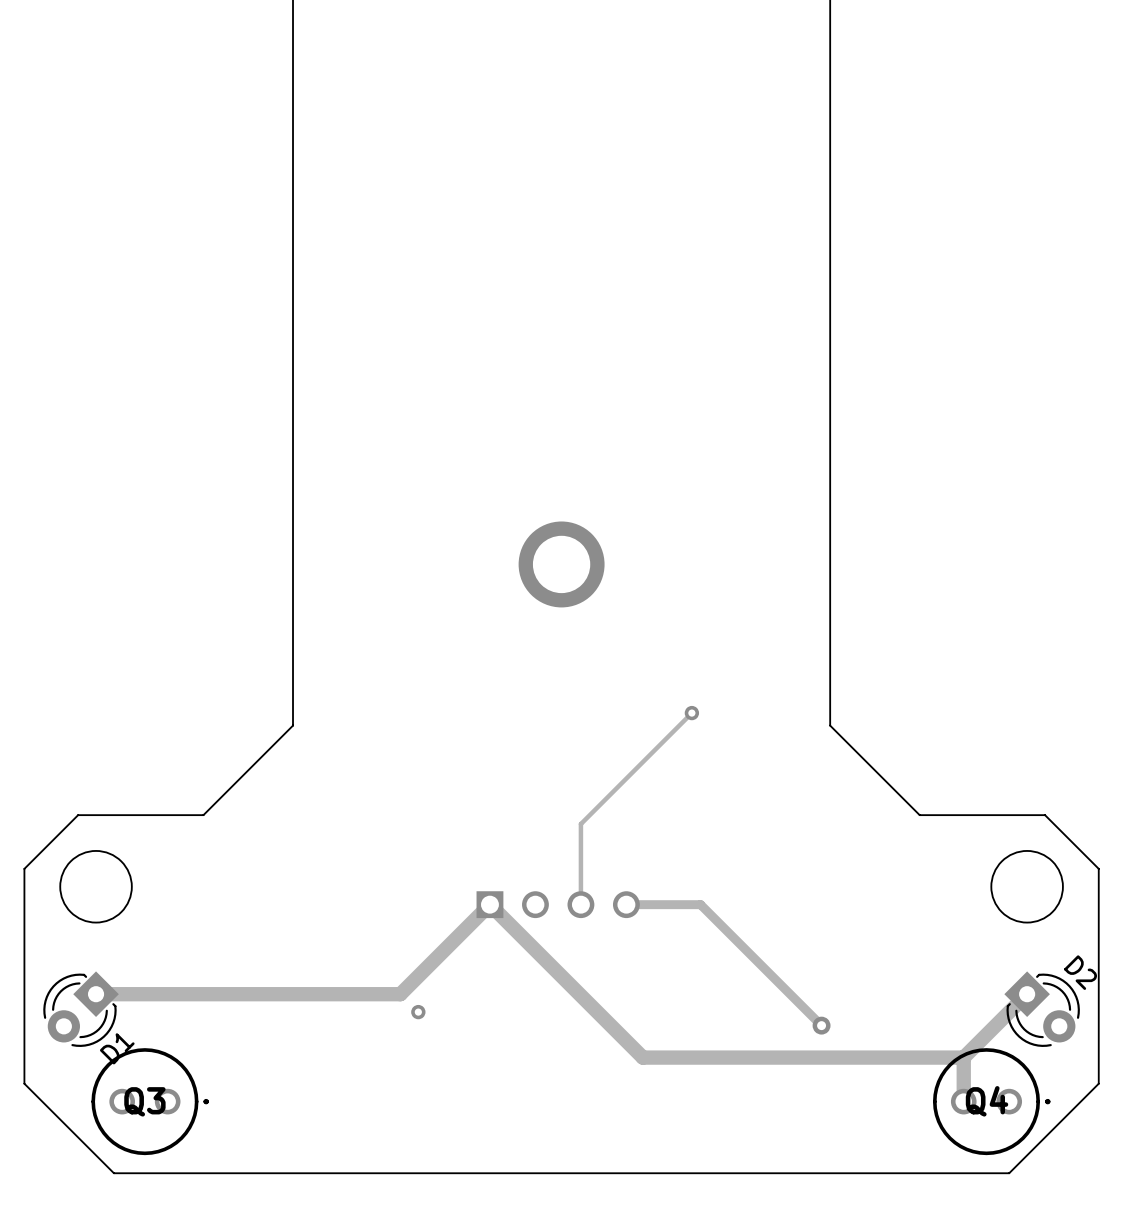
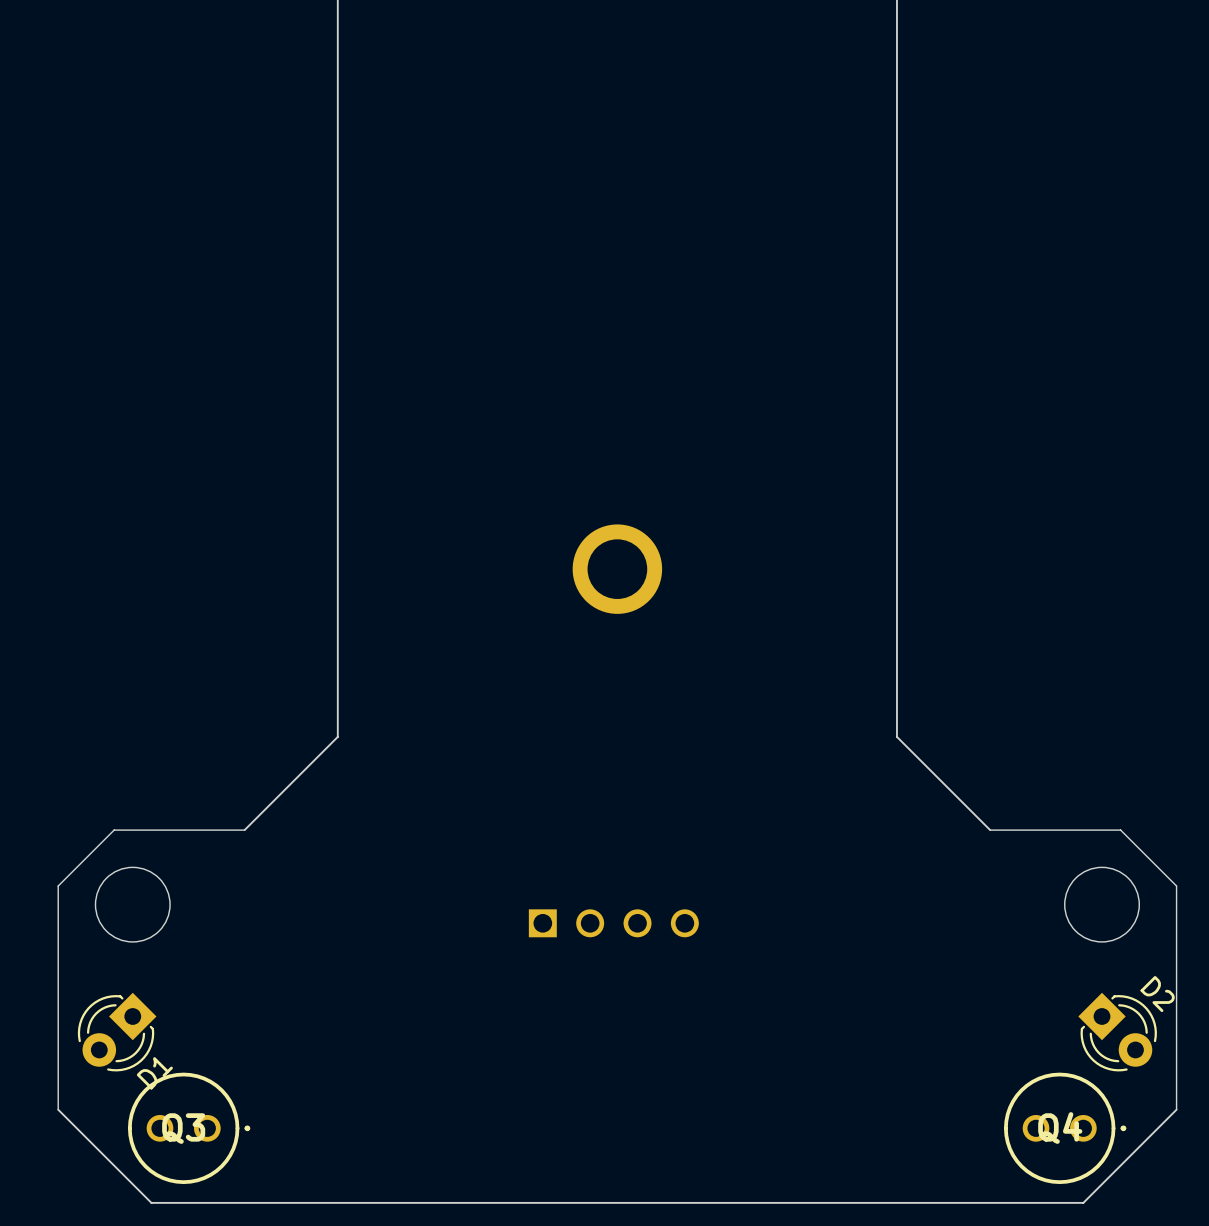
track: (691, 713) (580, 824) (580, 904) -> none
via: (691, 713) -> none
track: (626, 904) (700, 904) (821, 1025) -> none
track: (96, 994) (400, 994) (489, 904) (642, 1057) (963, 1057) -> none
track: (1027, 994) (963, 1057) -> none
via: (418, 1012) -> none
via: (821, 1025) -> none
track: (963, 1057) (963, 1101) -> none

